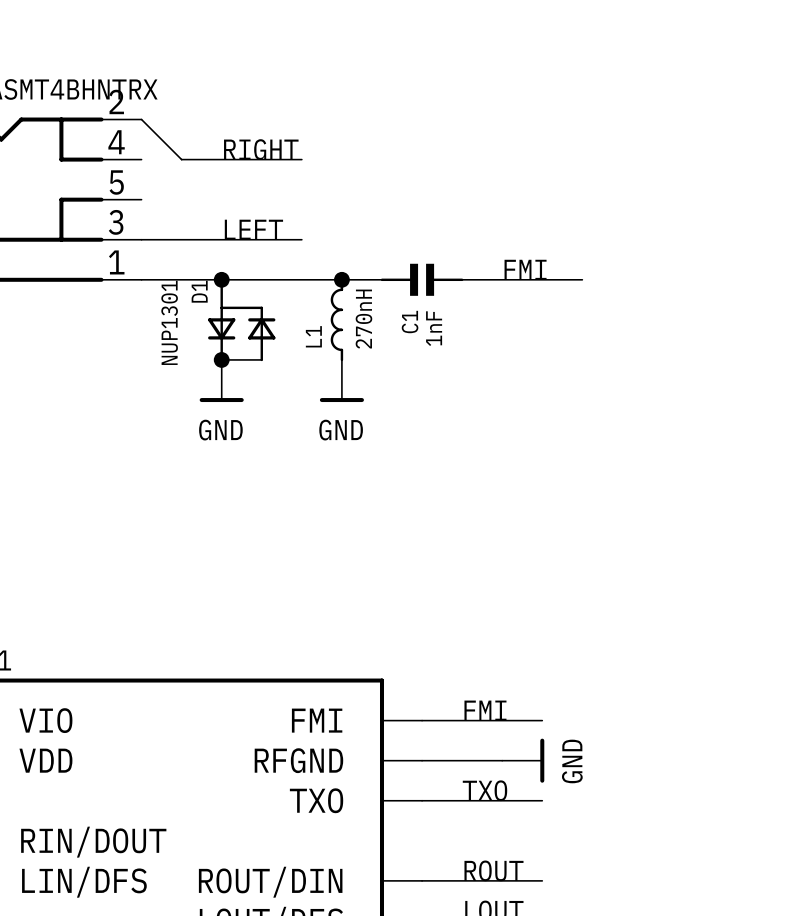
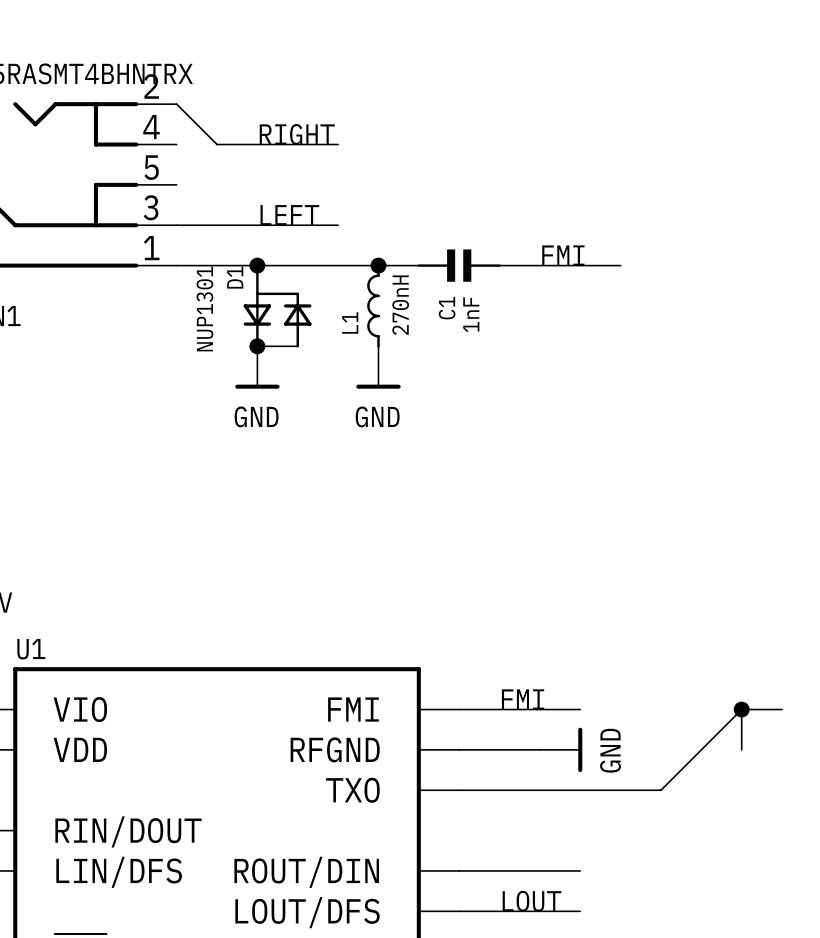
wire: none -> (741, 709) (782, 709)
wire: none -> (741, 709) (741, 749)
wire: none -> (741, 709) (660, 790) (580, 790)
junction: none -> (741, 709)
label: TXO (484, 790) -> none
label: ROUT (493, 870) -> none

